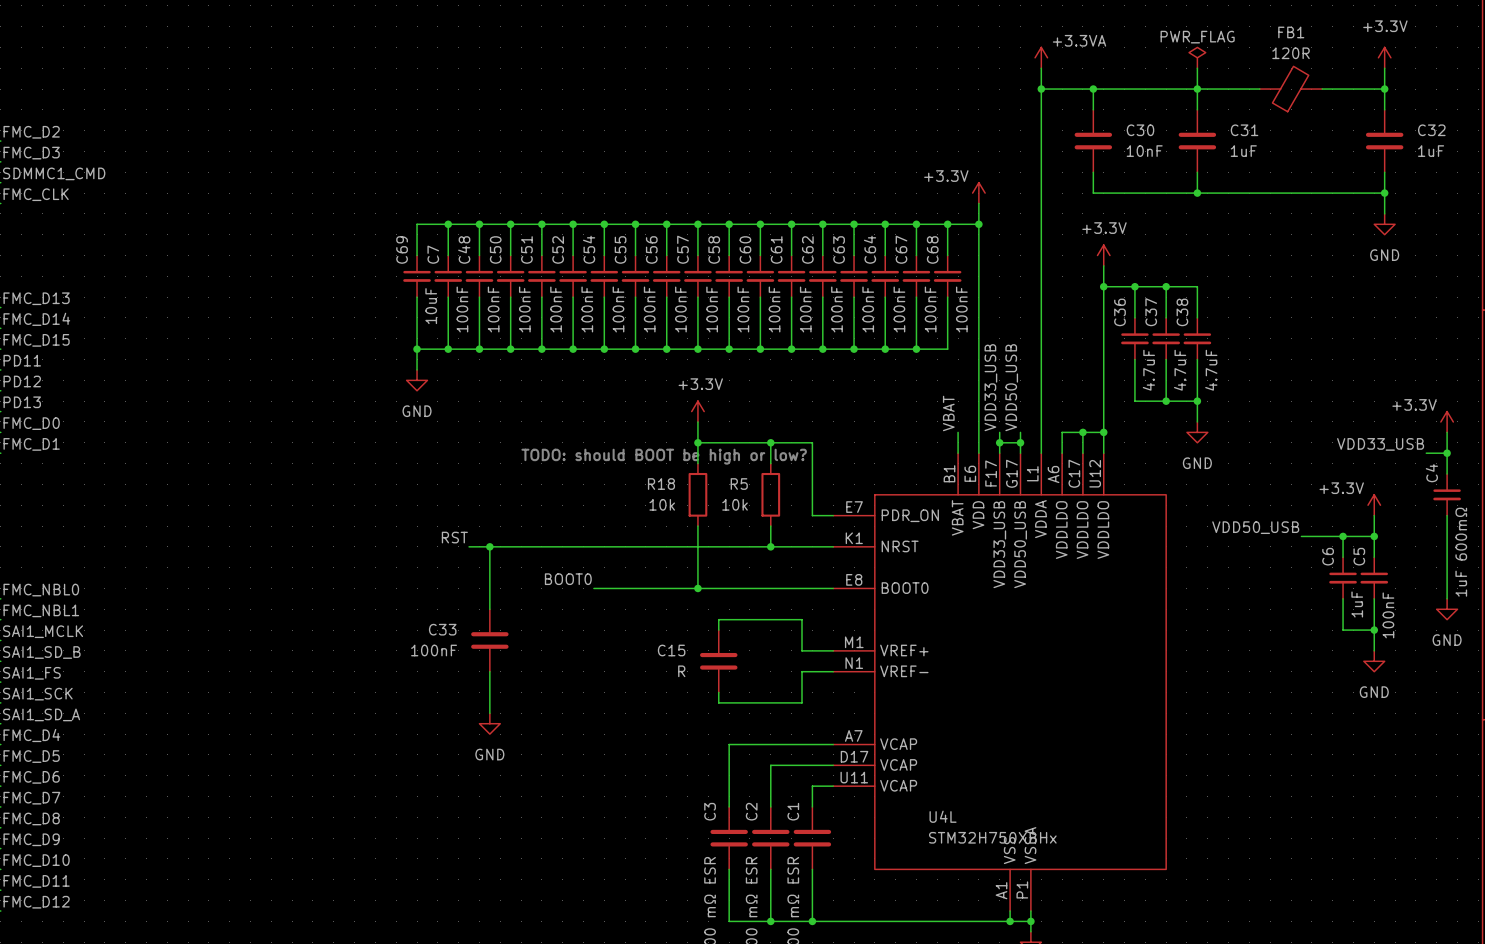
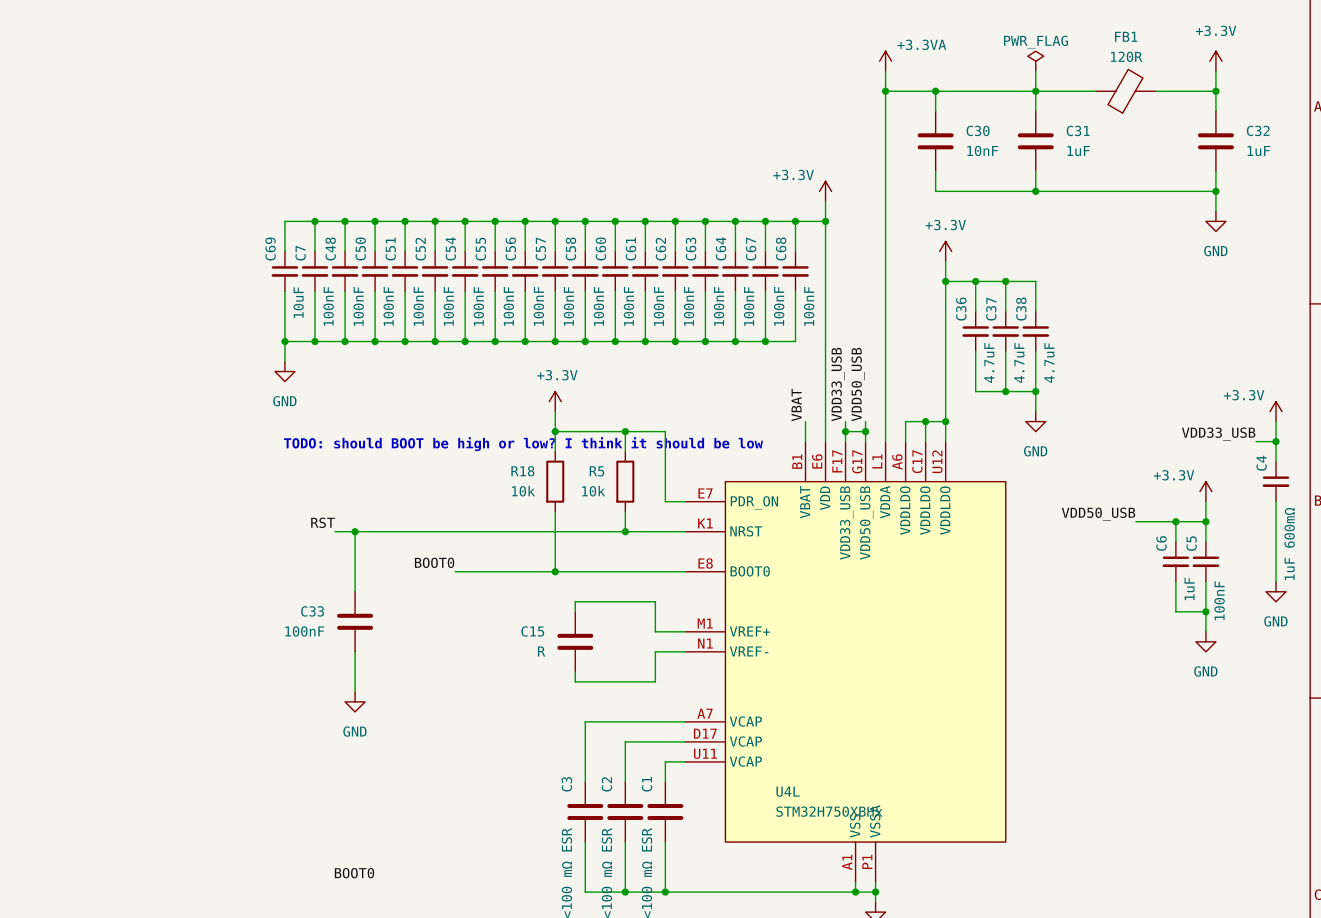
text: TODO: should BOOT be high or low? (664, 456) -> TODO: should BOOT be high or low? I think it should be low (523, 444)
label: none -> BOOT0 (354, 873)

